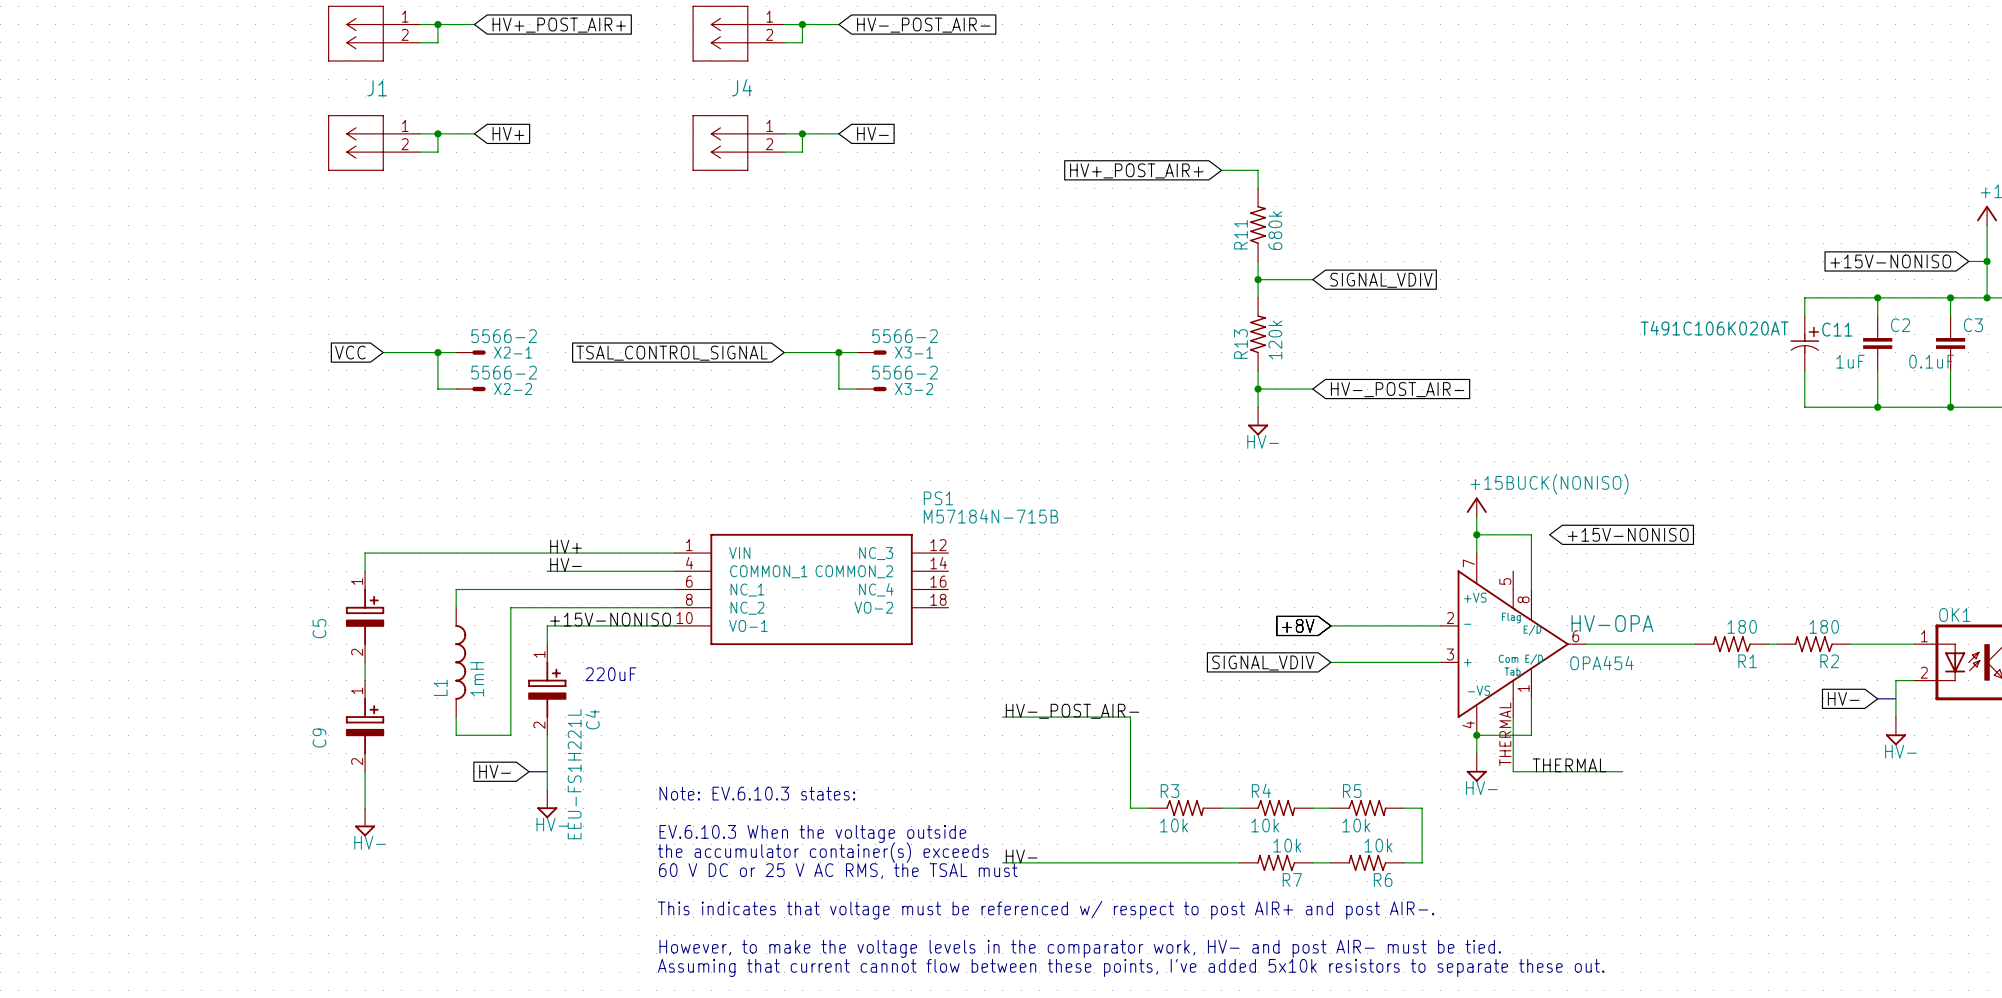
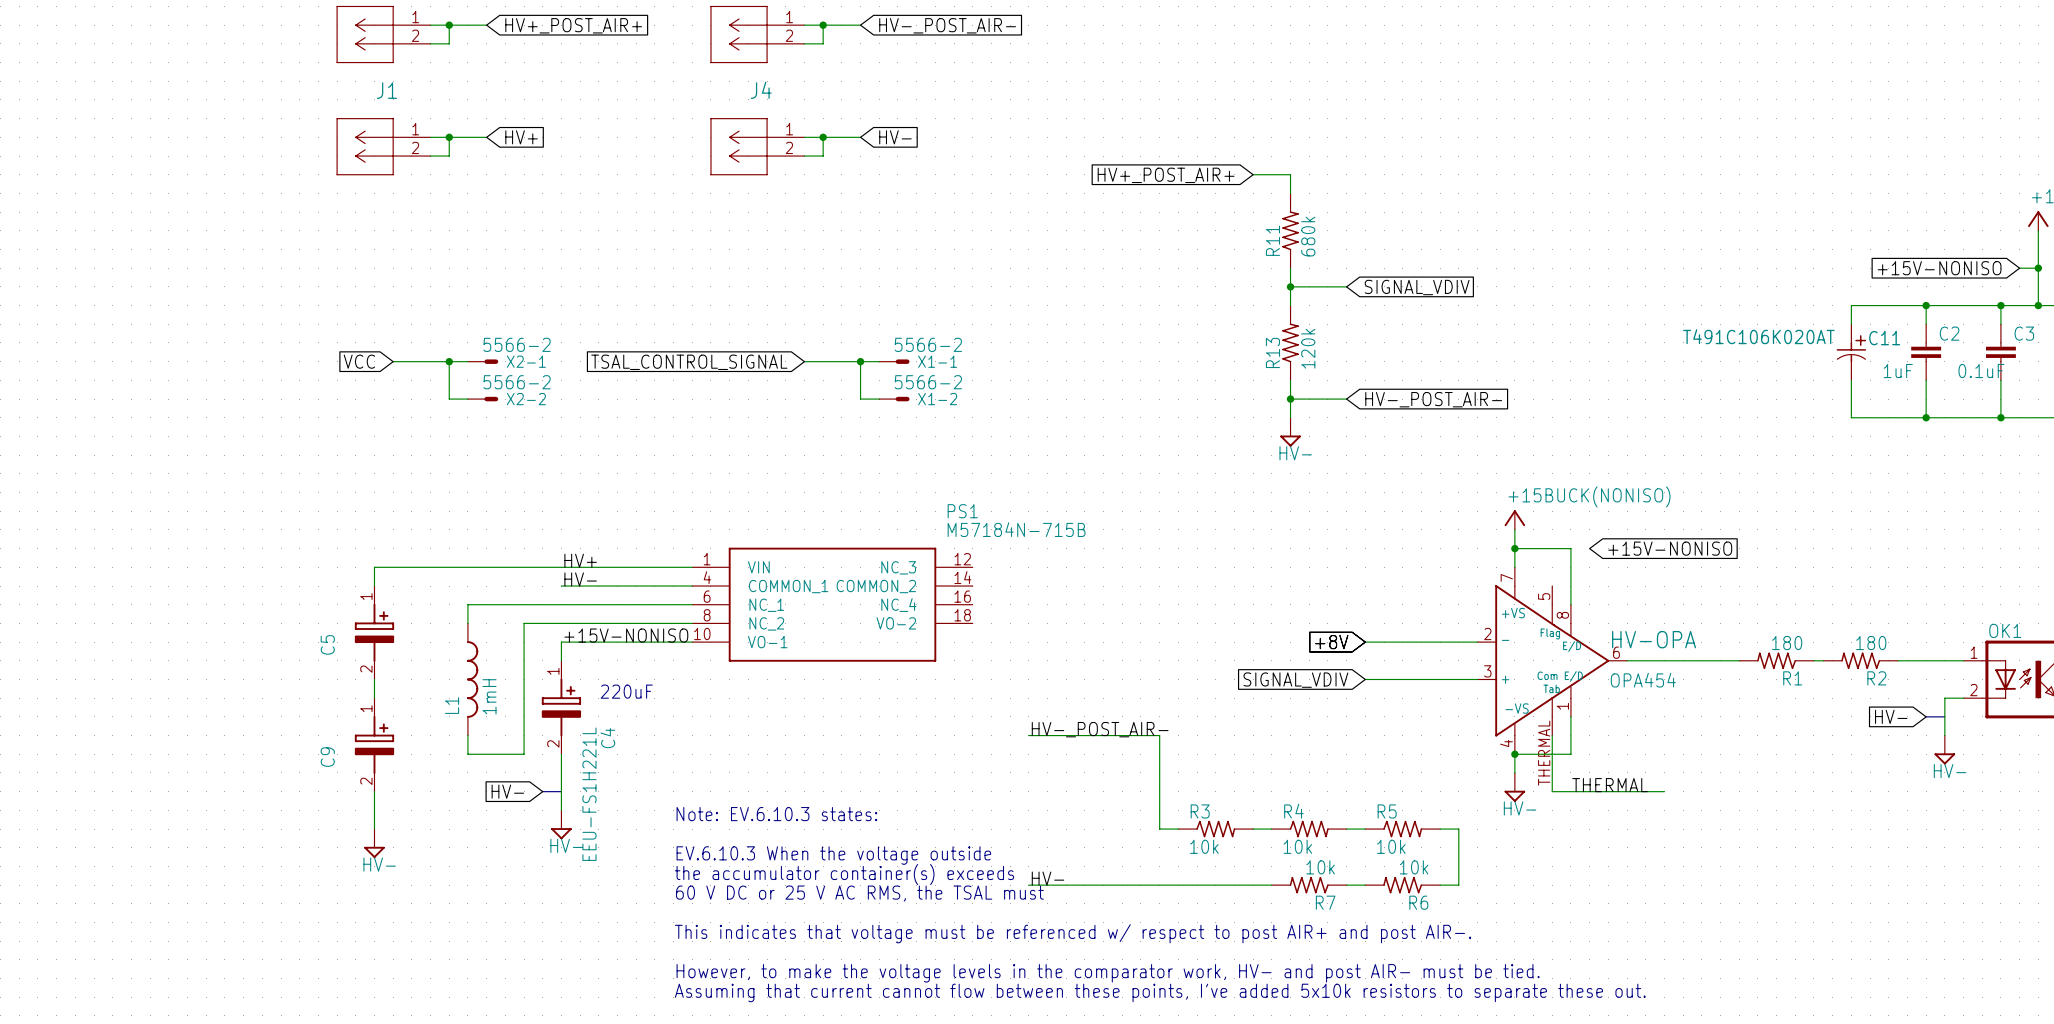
X3-1 name: X3-1 (914, 352) -> X1-1 (937, 361)
X3-2 name: X3-2 (914, 389) -> X1-2 (937, 399)

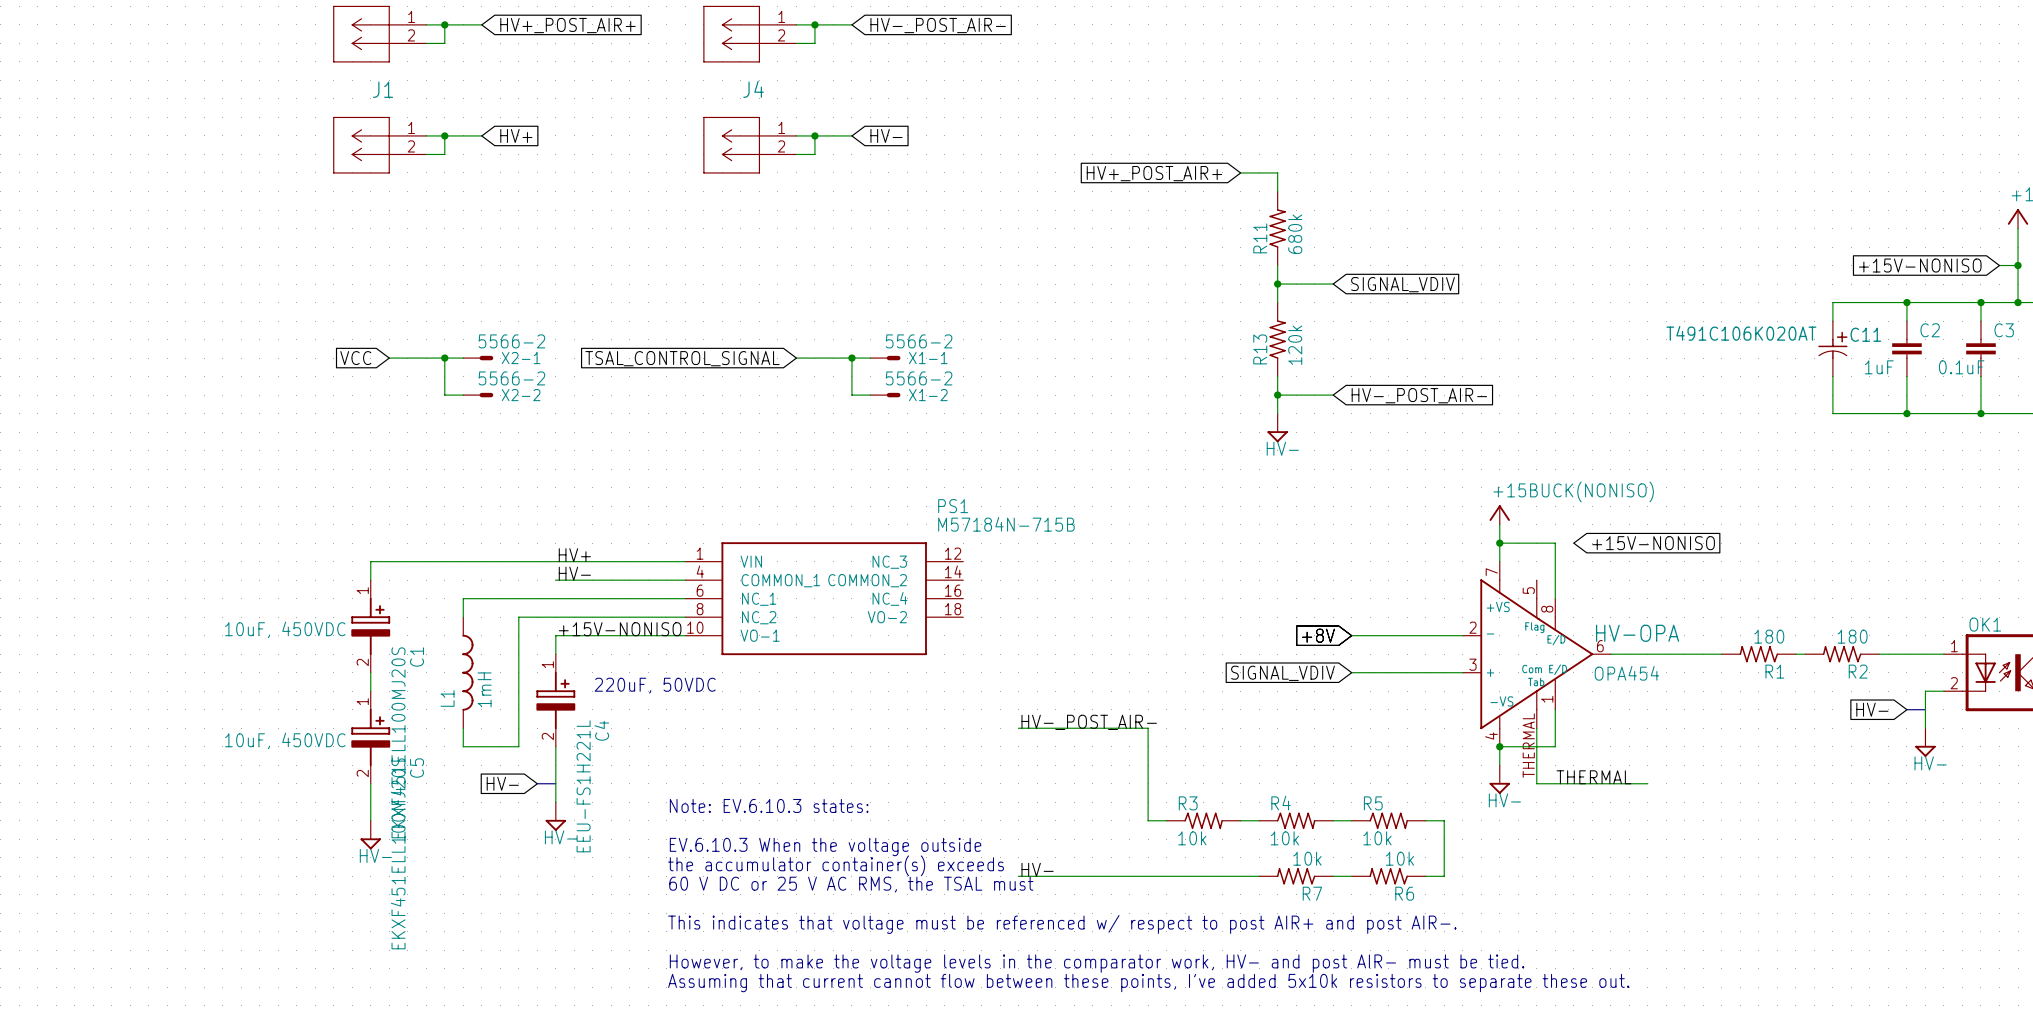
text: none -> 10uF, 450VDC (285, 629)
C5 name: C5 (327, 644) -> C1 (417, 657)
text: 220uF (626, 691) -> 220uF, 50VDC (655, 685)
text: none -> 10uF, 450VDC (285, 740)
C5 value: none -> EKXF451ELL100MJ20S (398, 742)
C9 name: C9 (327, 757) -> C5 (417, 768)
C9 value: none -> EKXF451ELL100MJ20S (398, 853)

